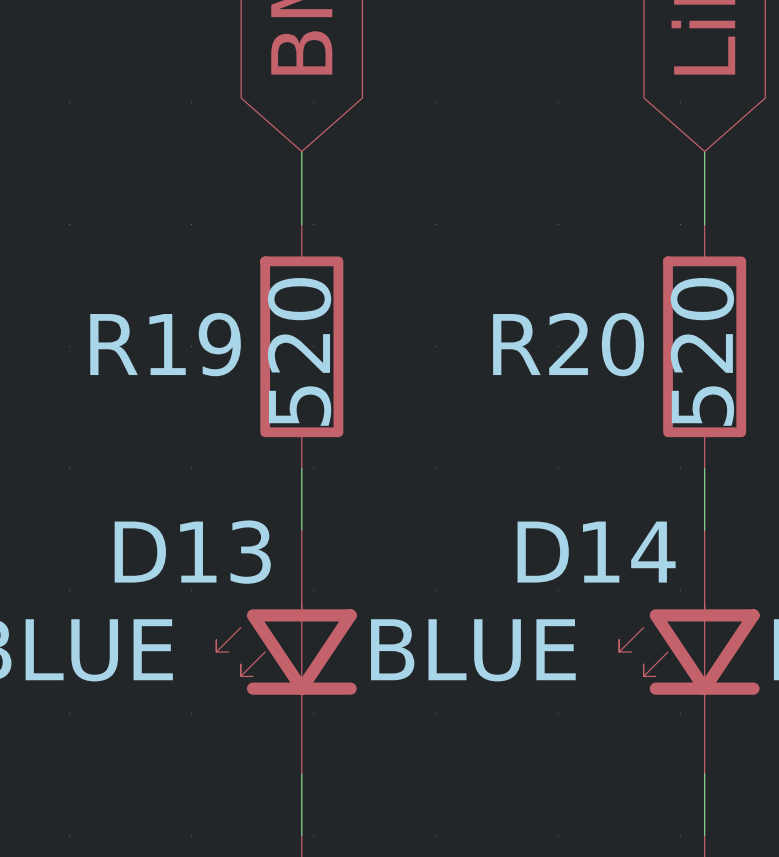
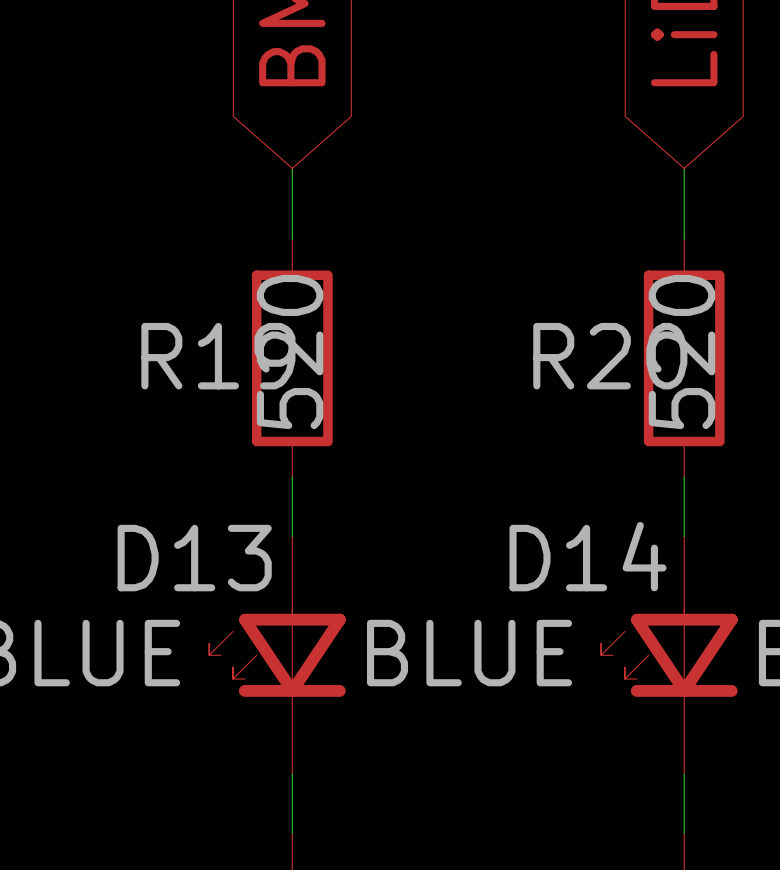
R19 name position: R19 (165, 344) -> R19 (218, 356)
R20 name position: R20 (568, 344) -> R20 (610, 356)

